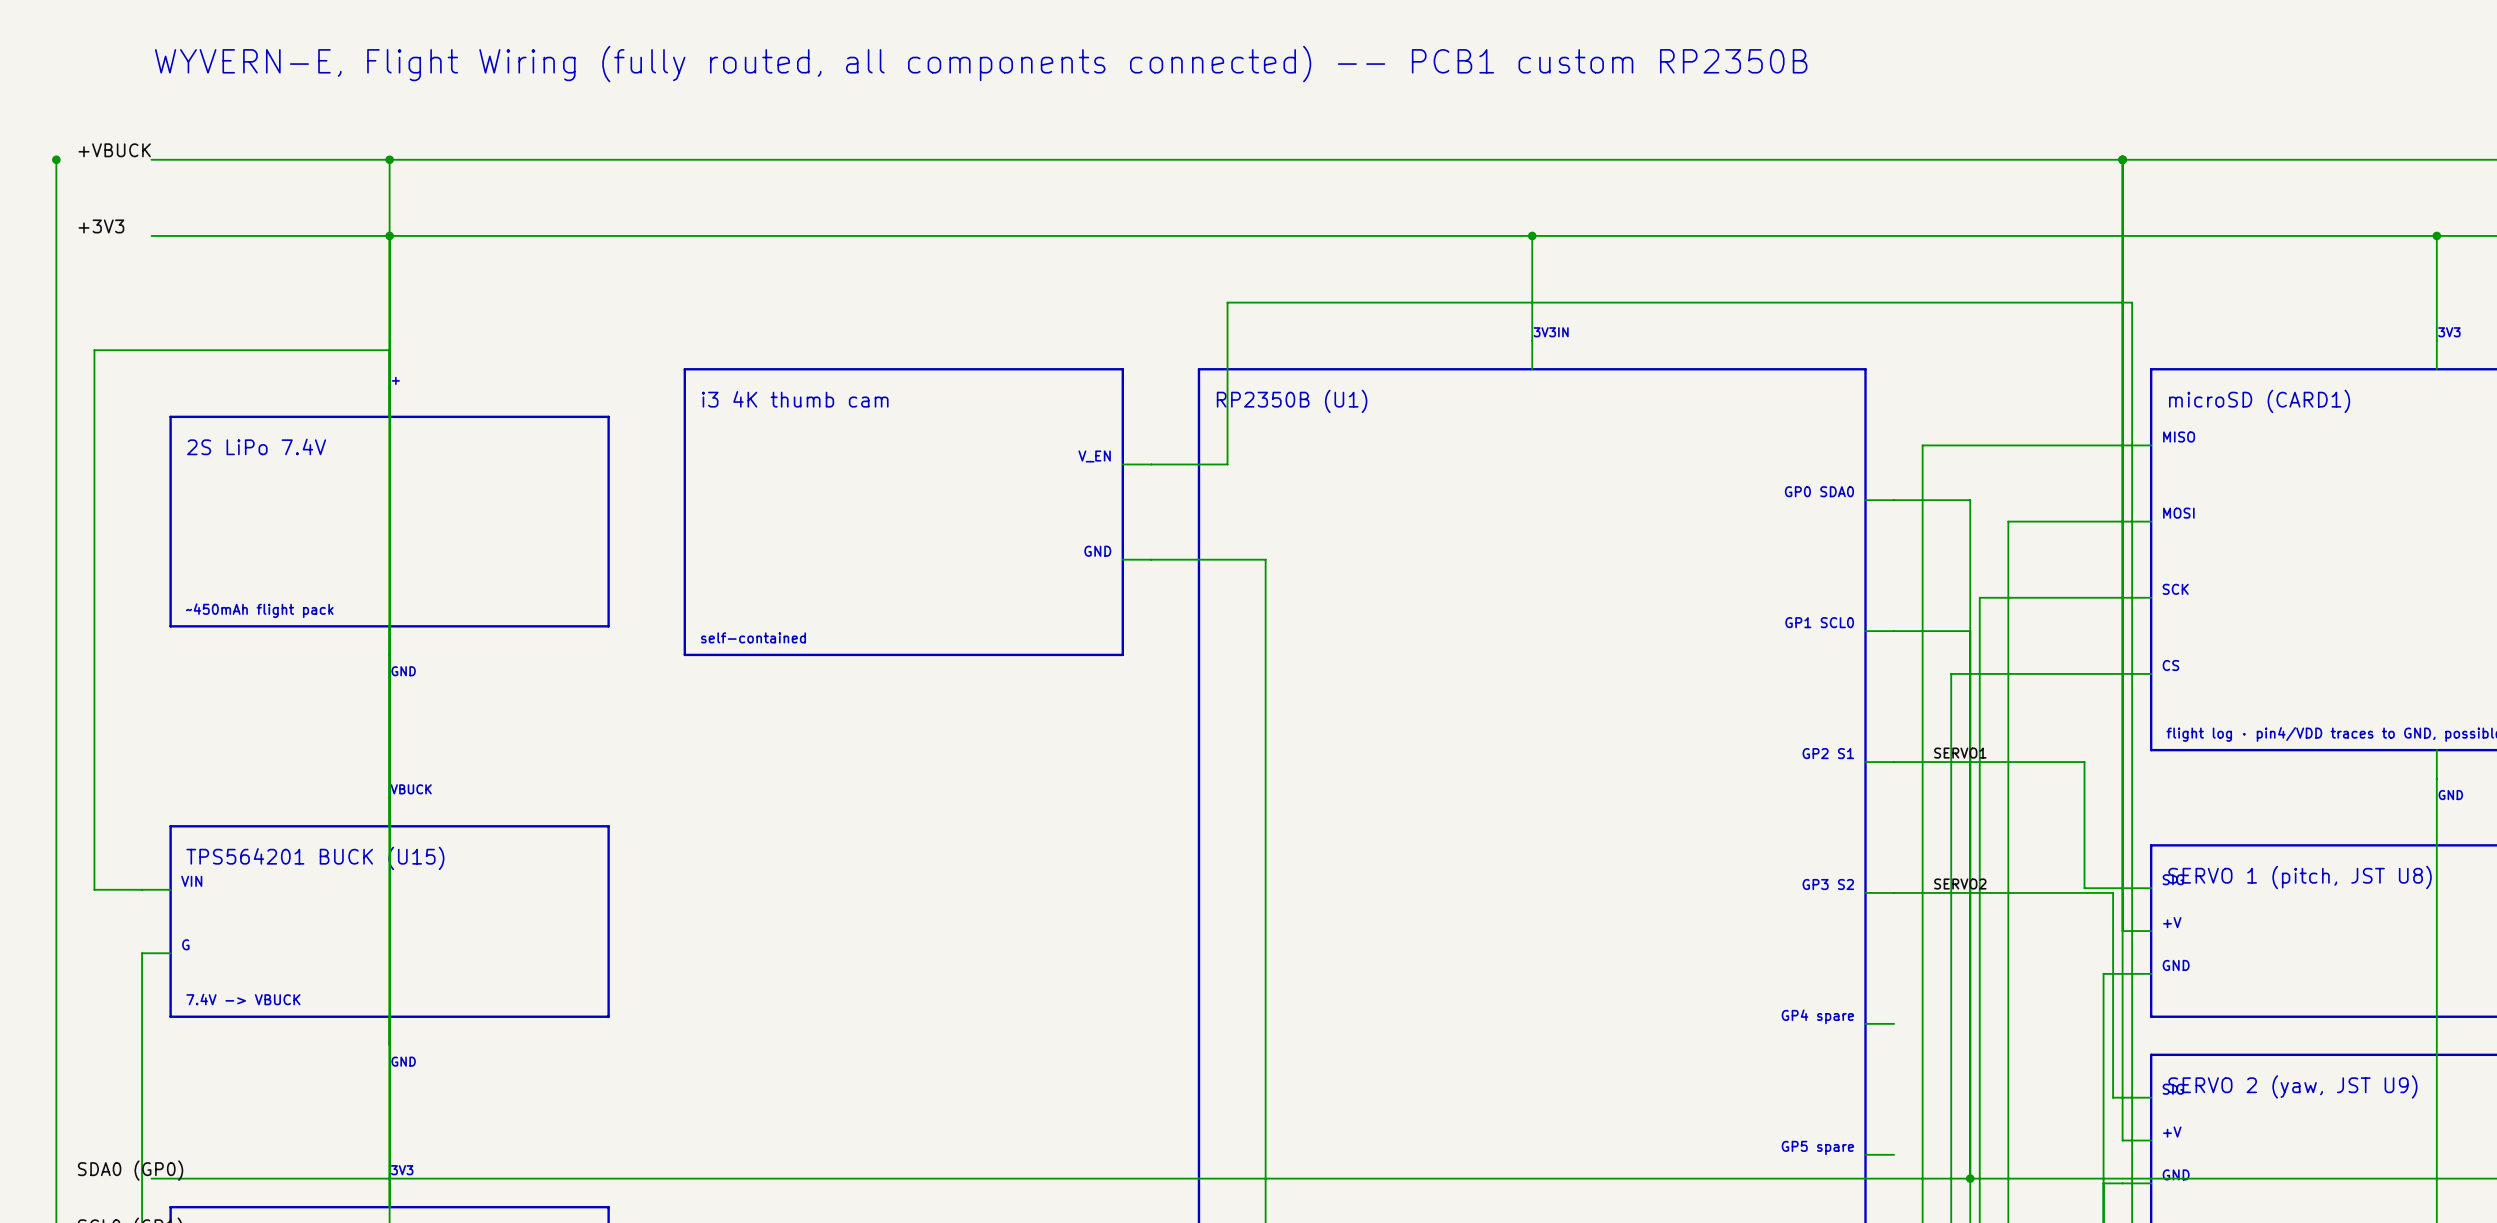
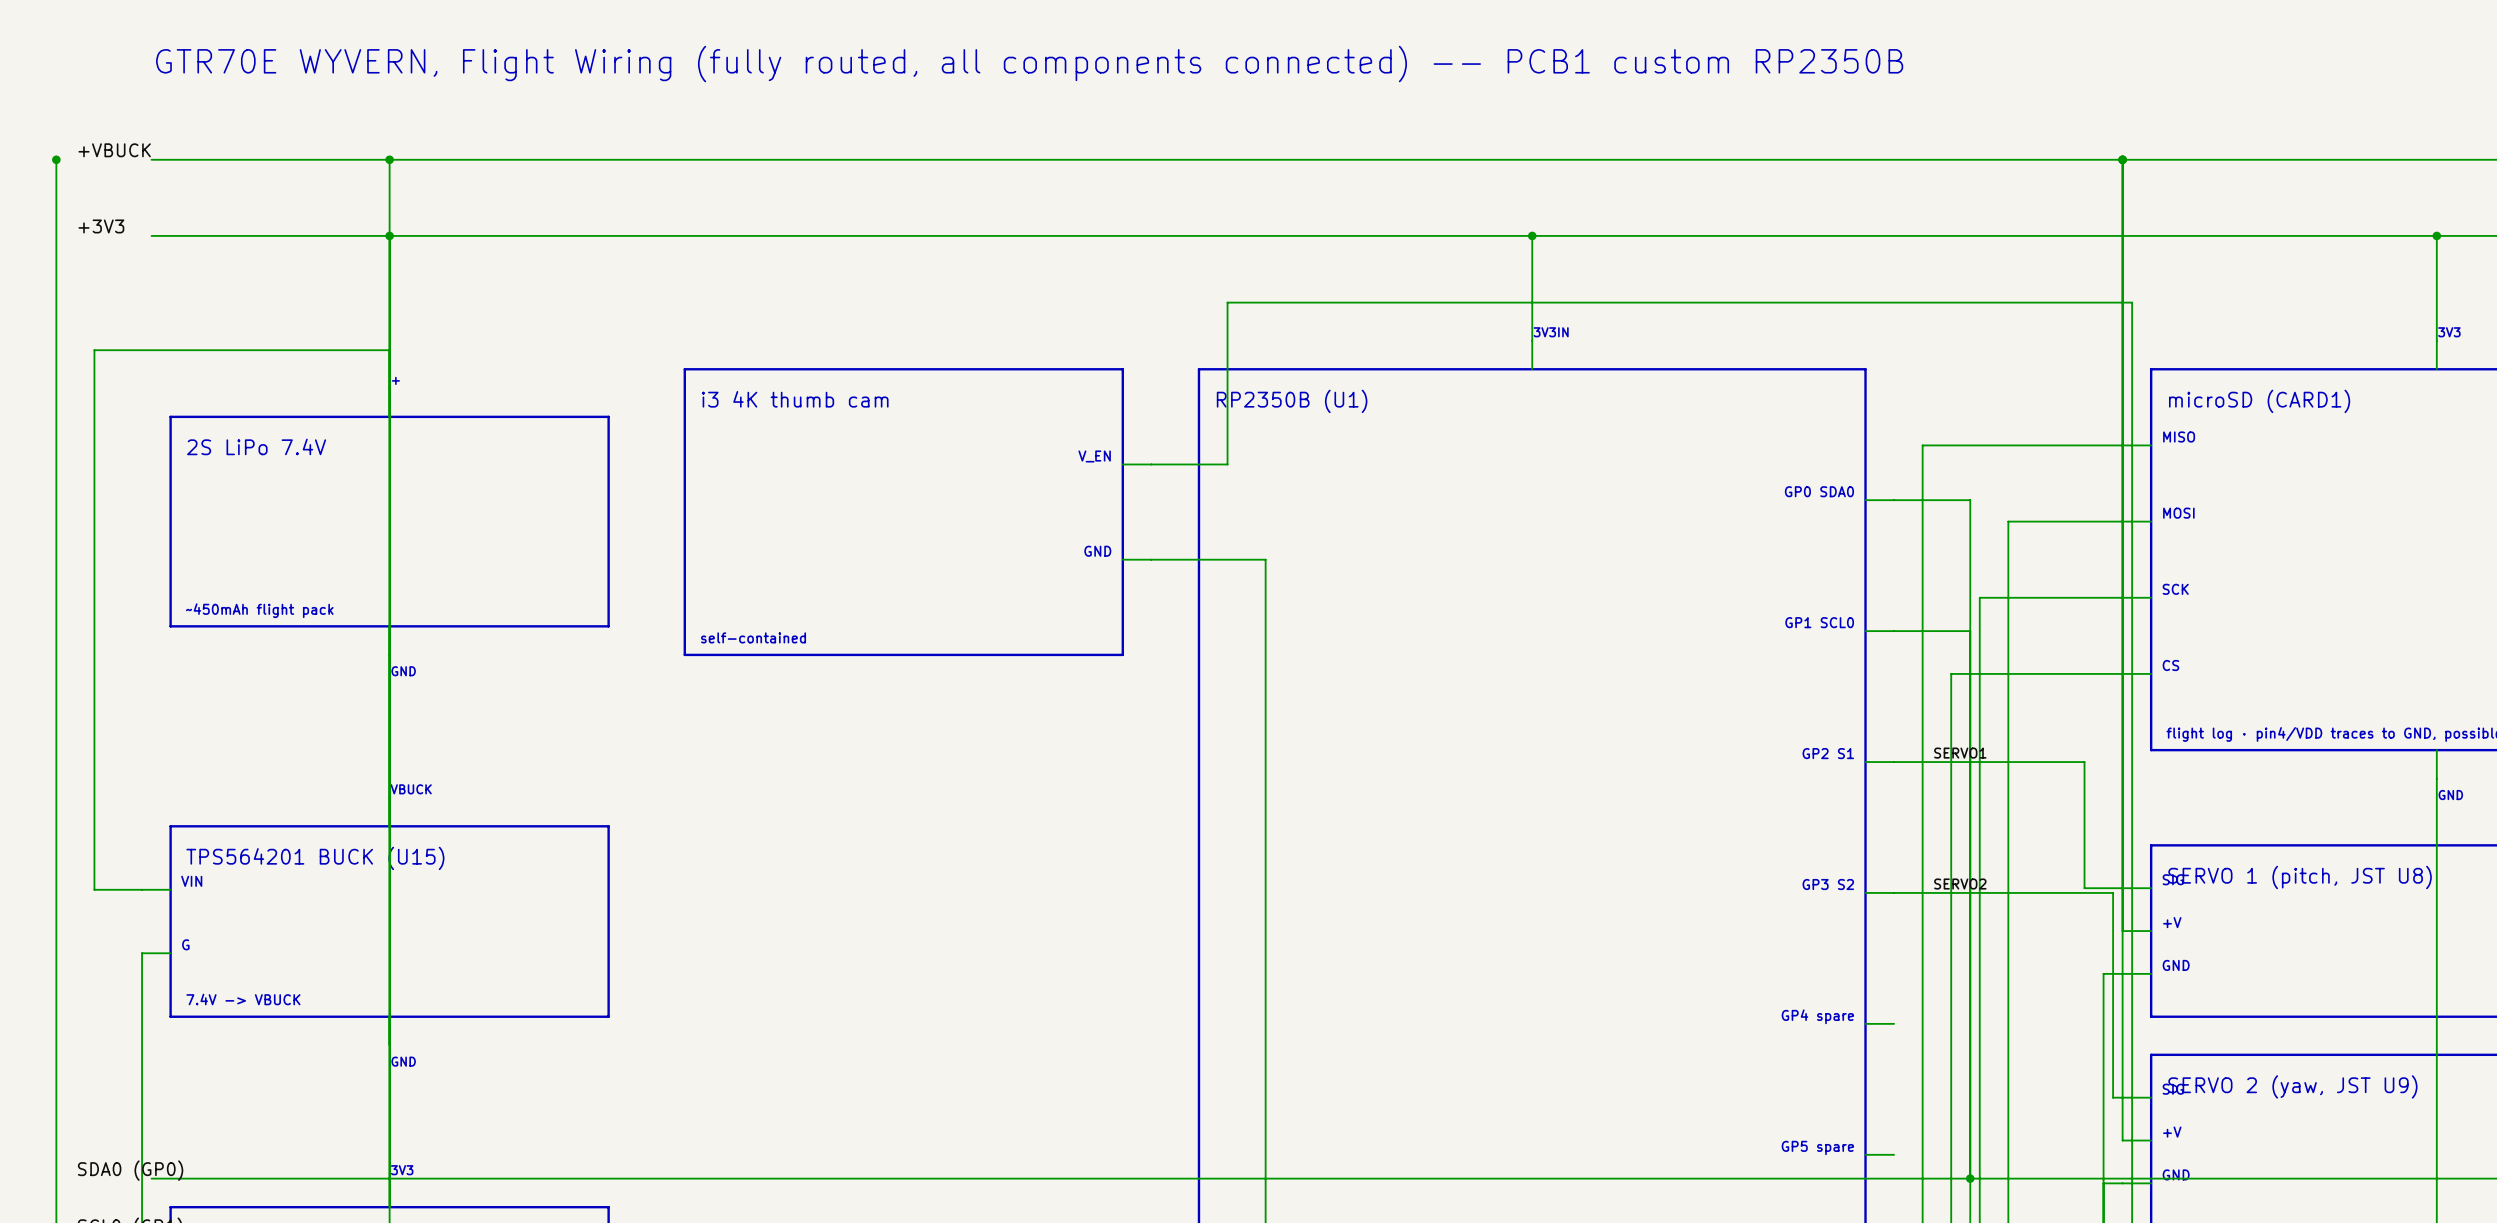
text: WYVERN-E, Flight Wiring (fully routed, all components connected) -- PCB1 custom RP2350B (981, 64) -> GTR70E WYVERN, Flight Wiring (fully routed, all components connected) -- PCB1 custom RP2350B (1029, 64)

